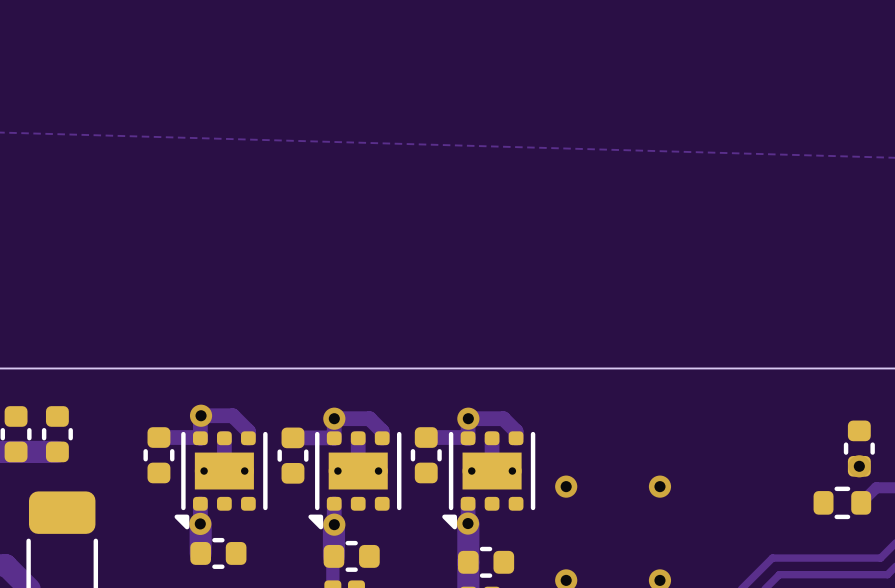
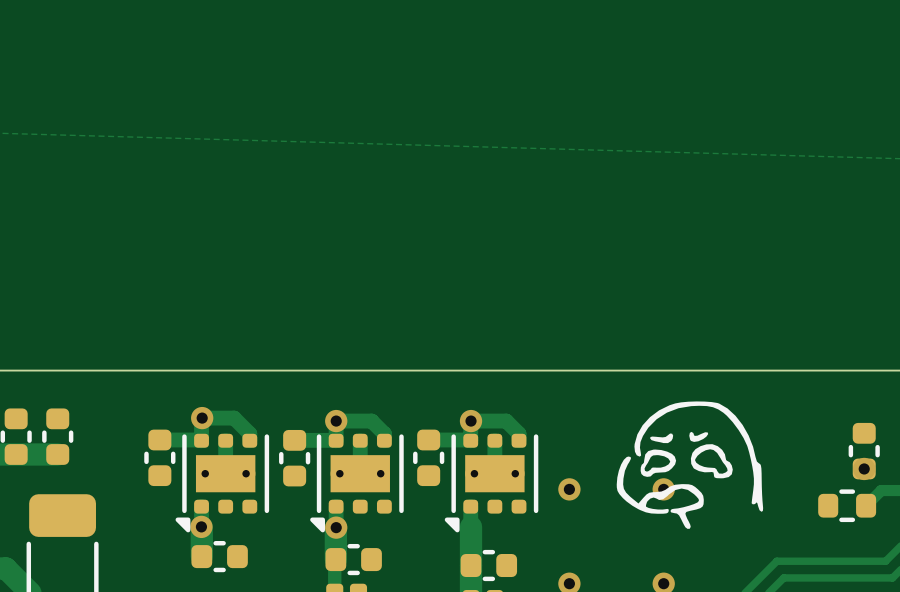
drawing: none -> [616, 401, 764, 529]
via: (467, 523) -> none

